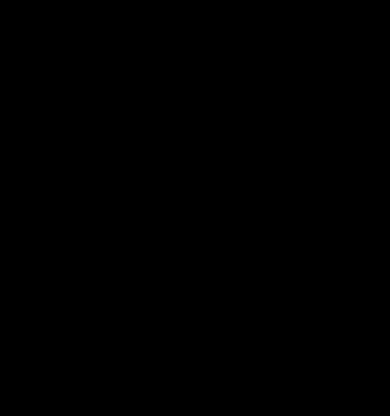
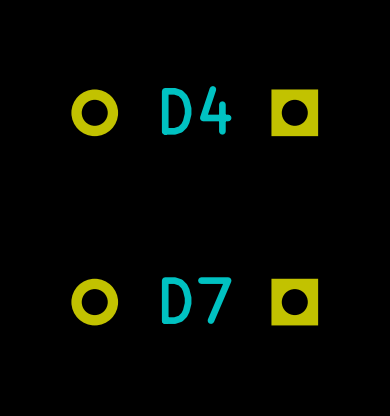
D4: none -> (194, 112)
D7: none -> (194, 302)

